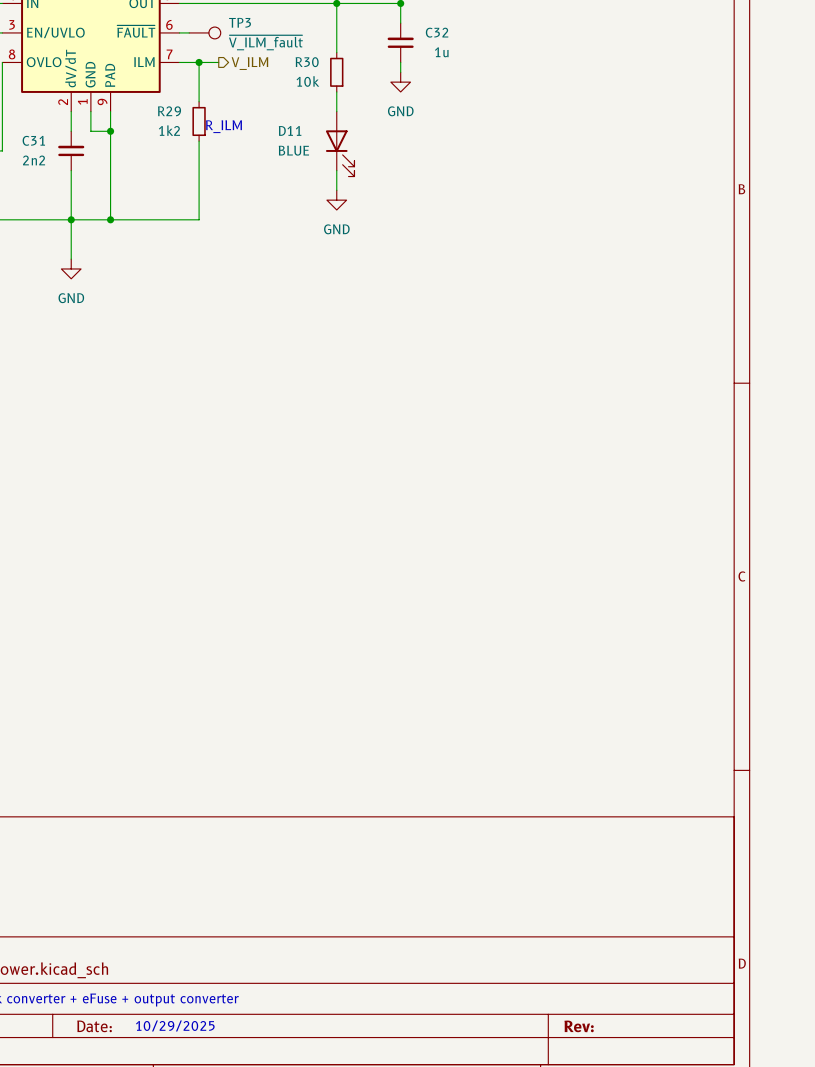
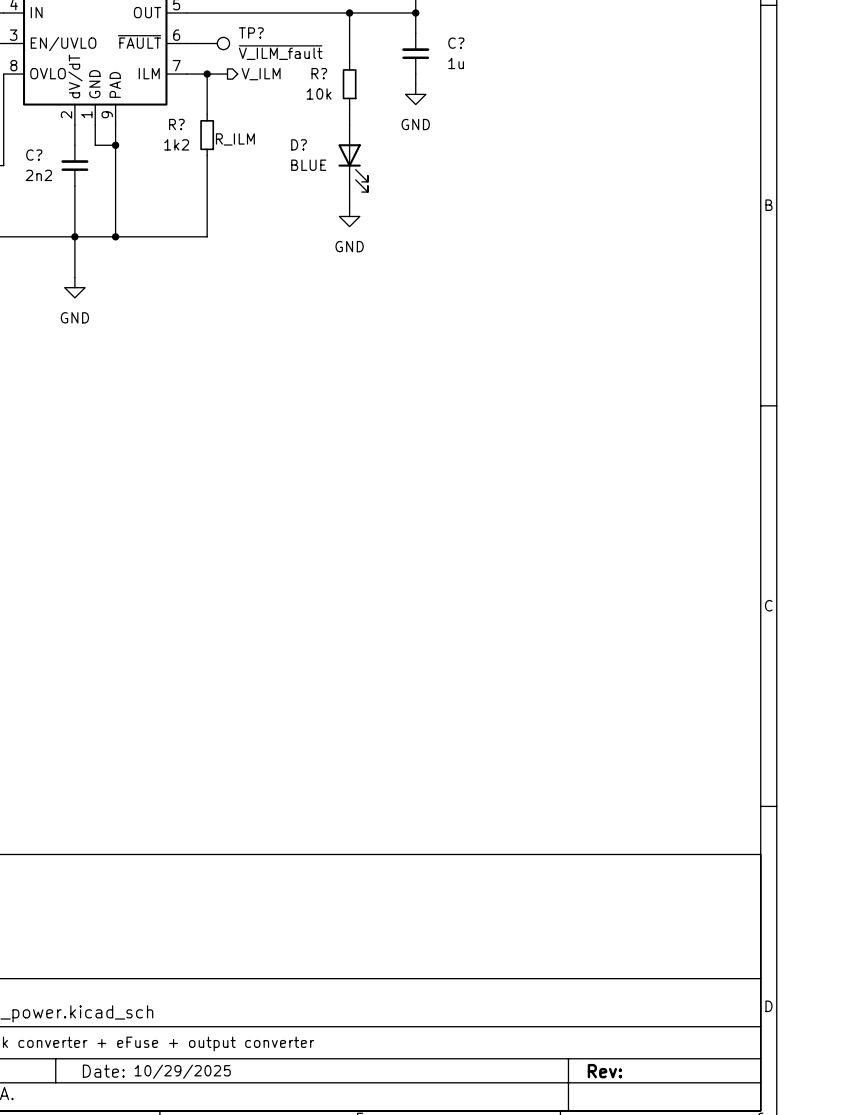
TP3 name: TP3 (240, 22) -> TP? (251, 32)
C32 name: C32 (437, 32) -> C? (456, 43)
R30 name: R30 (307, 62) -> R? (319, 73)
R29 name: R29 (169, 111) -> R? (176, 124)
D11 name: D11 (290, 130) -> D? (299, 144)
C31 name: C31 (33, 140) -> C? (34, 155)

